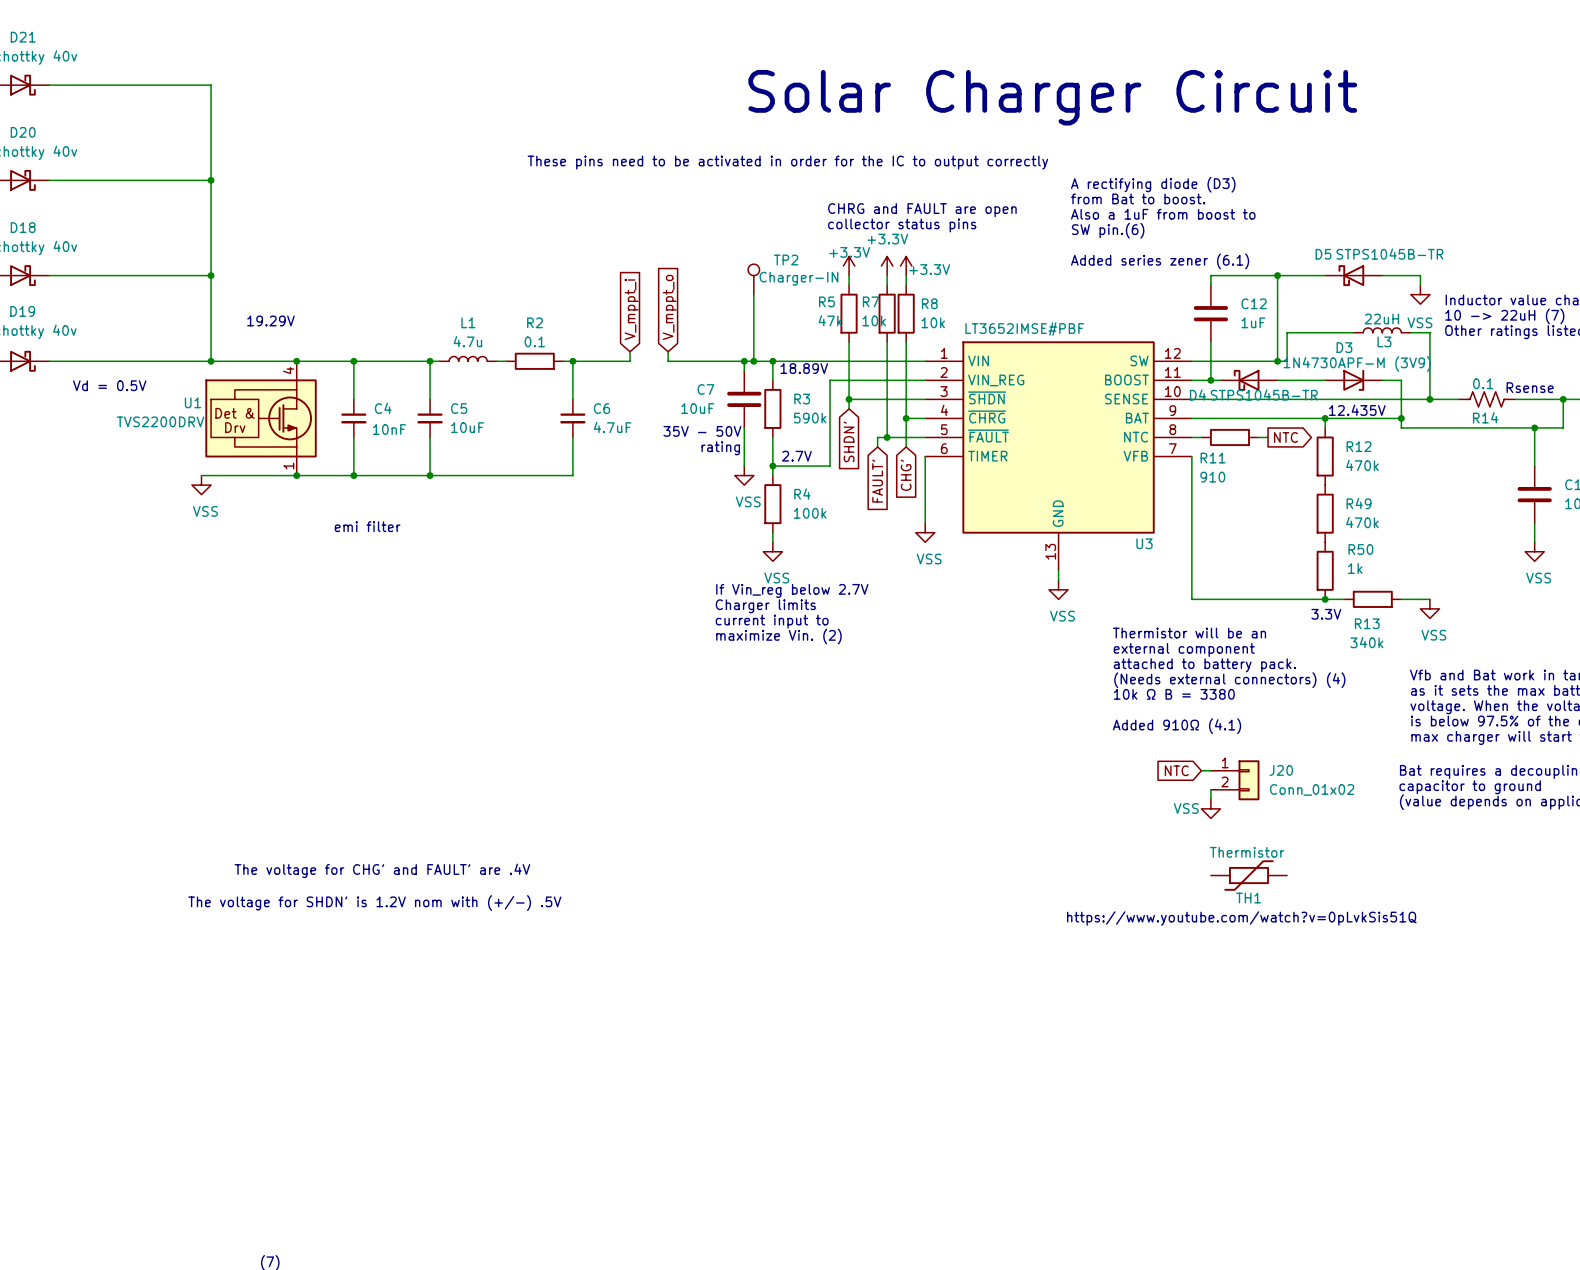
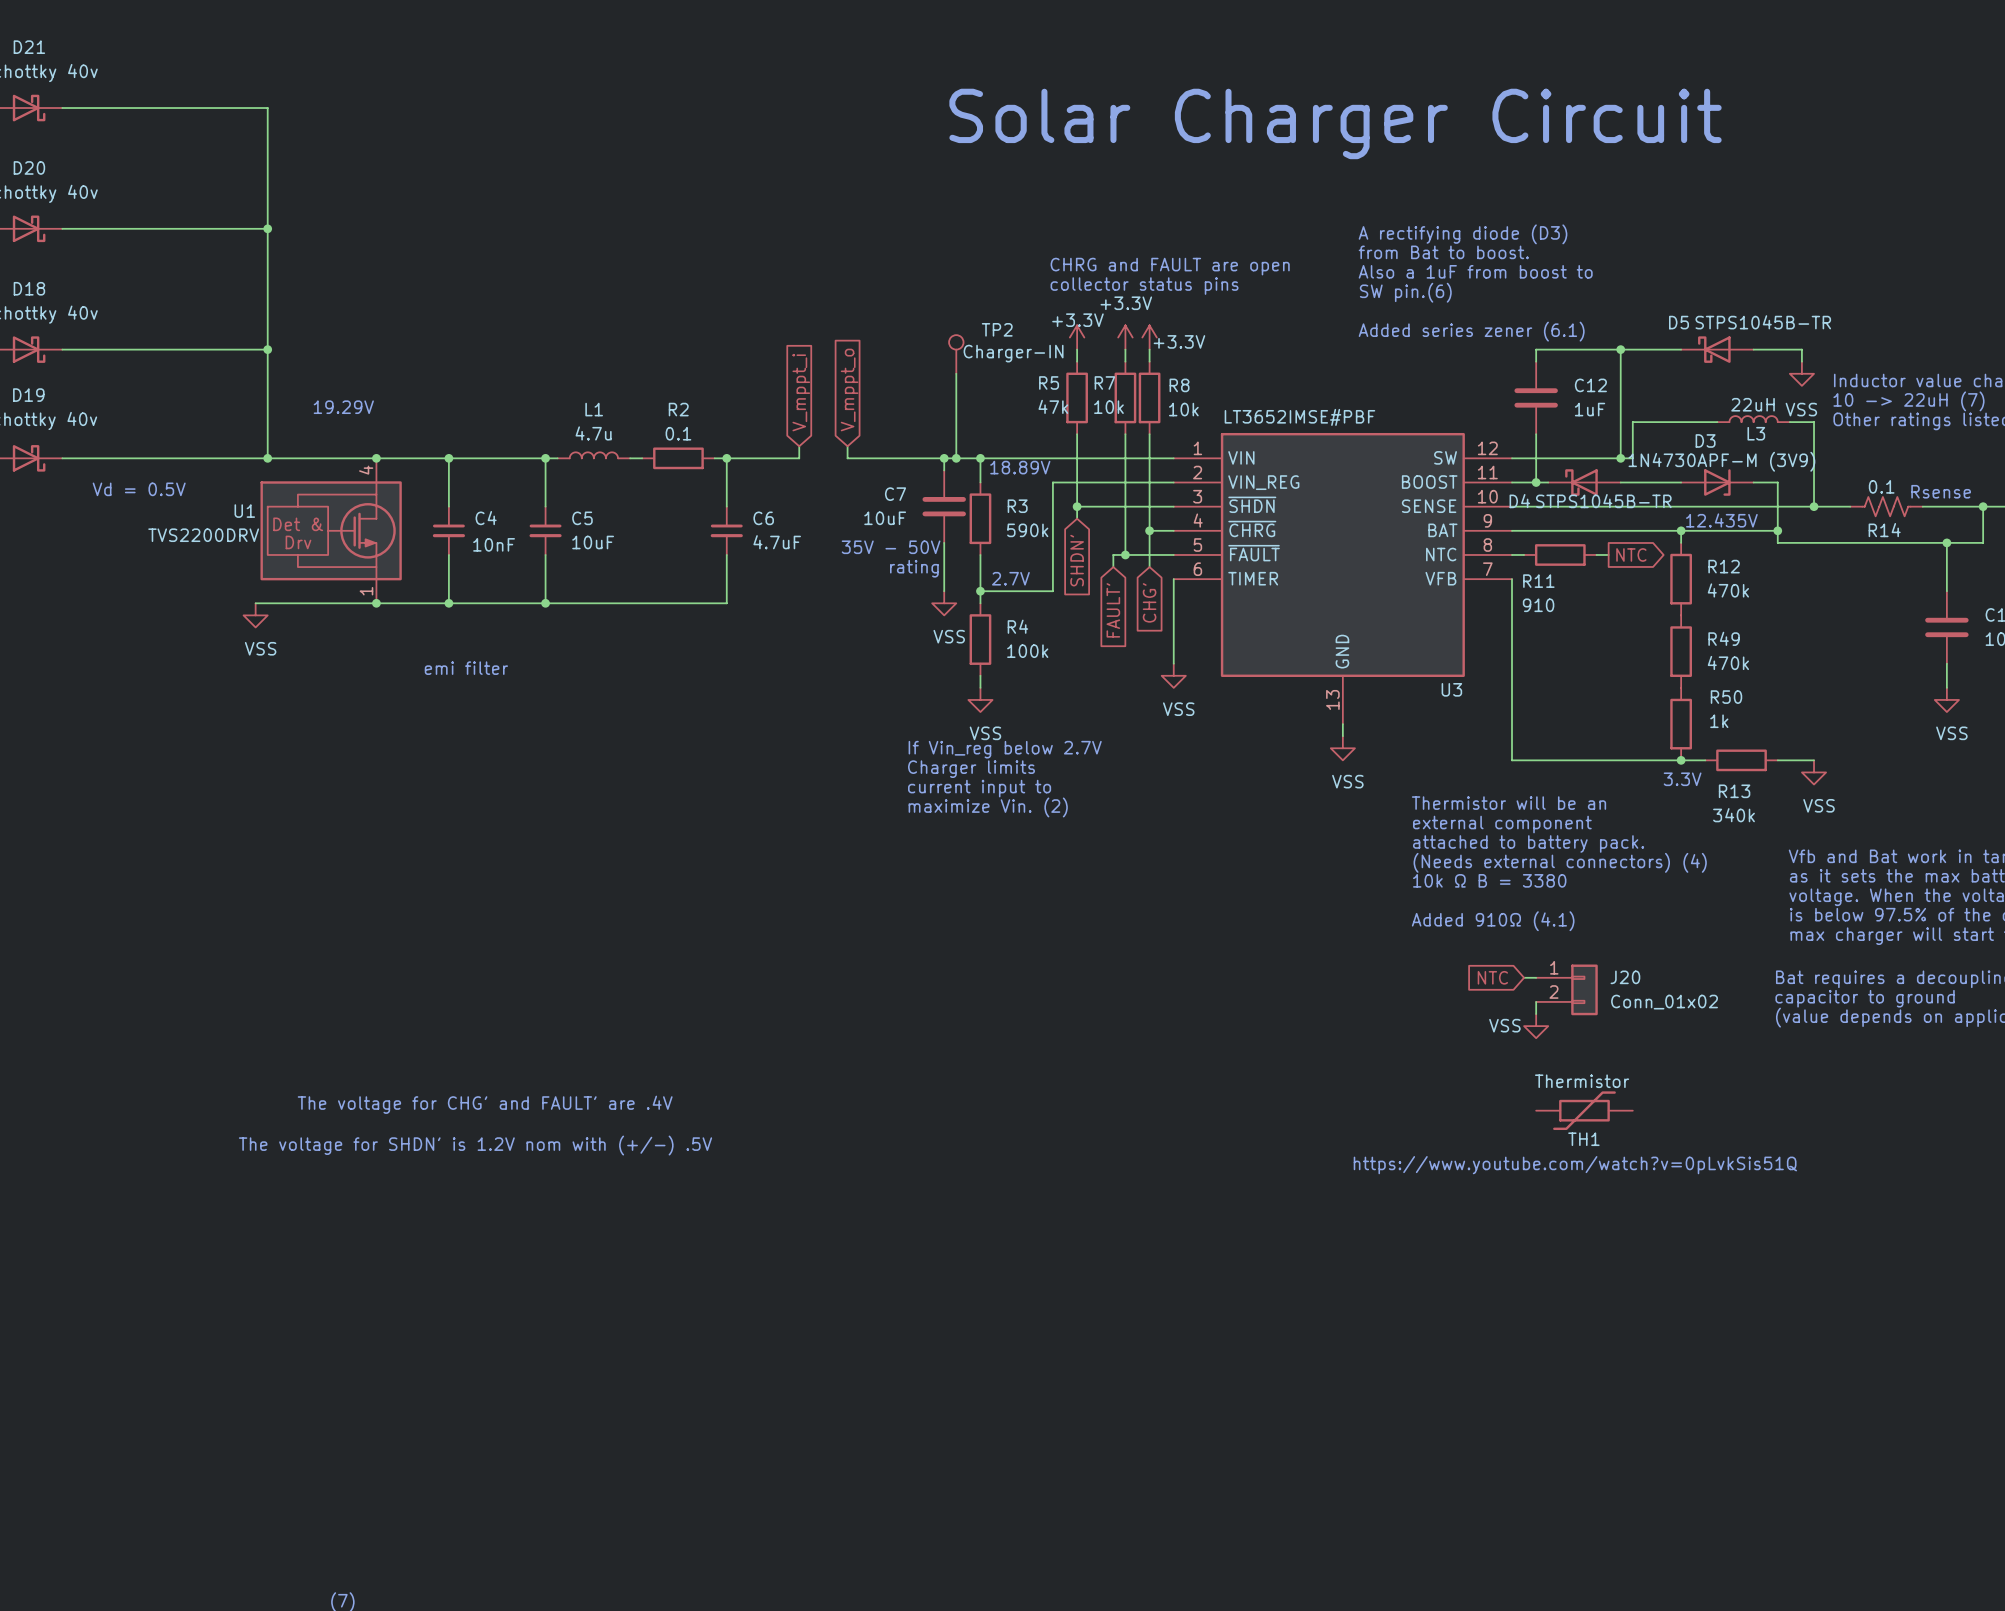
text: These pins need to be activated in order for the IC to output correctly (787, 162) -> none

